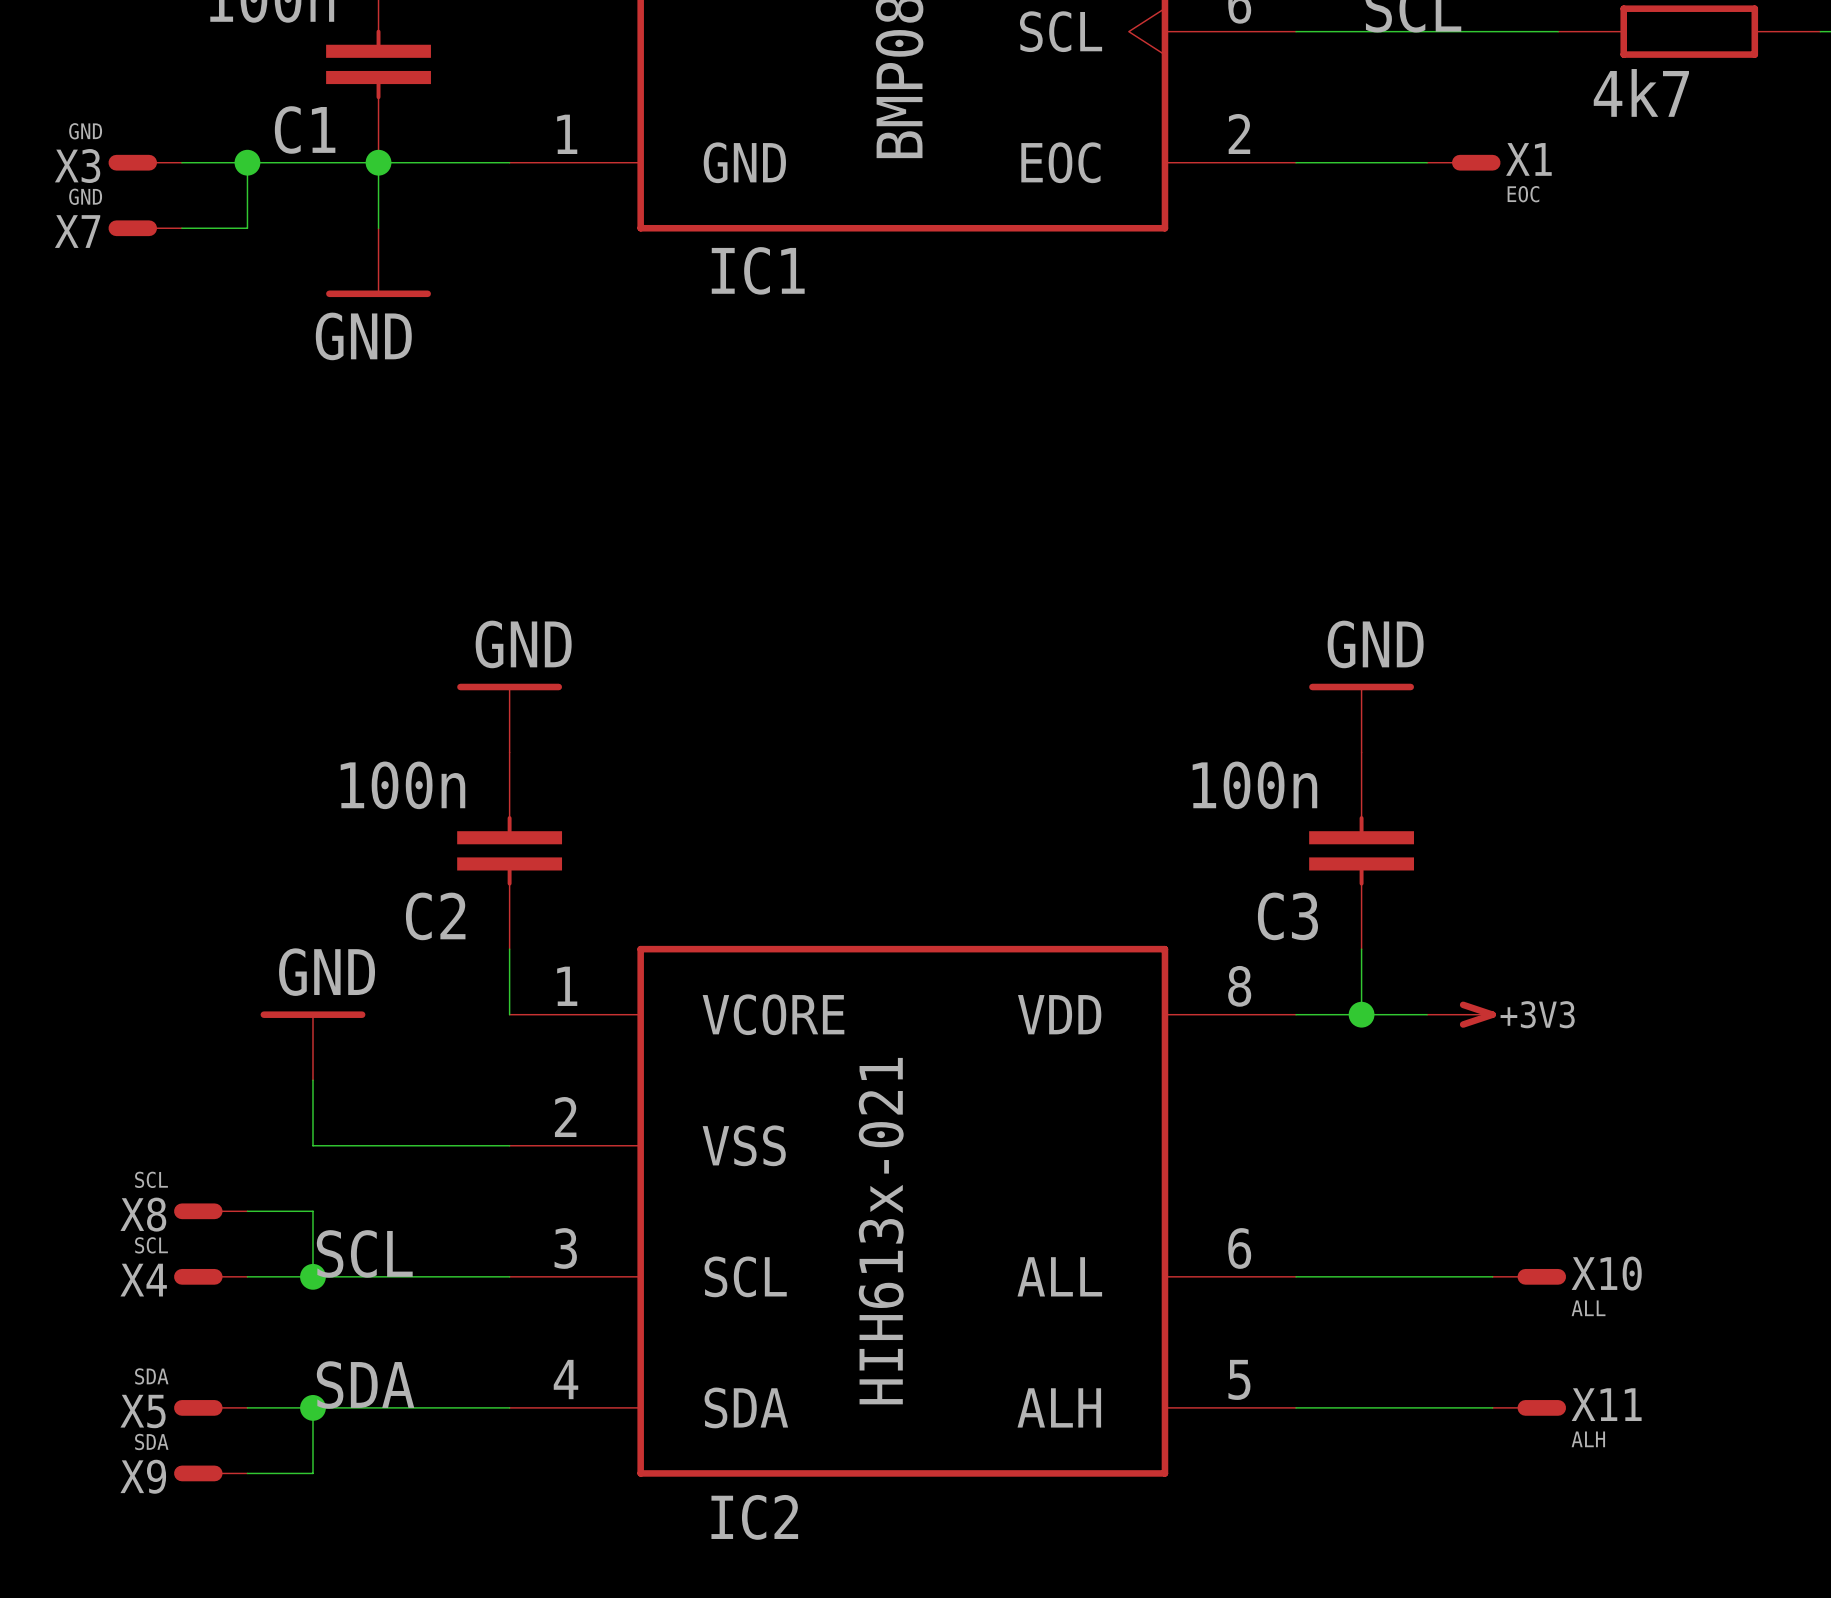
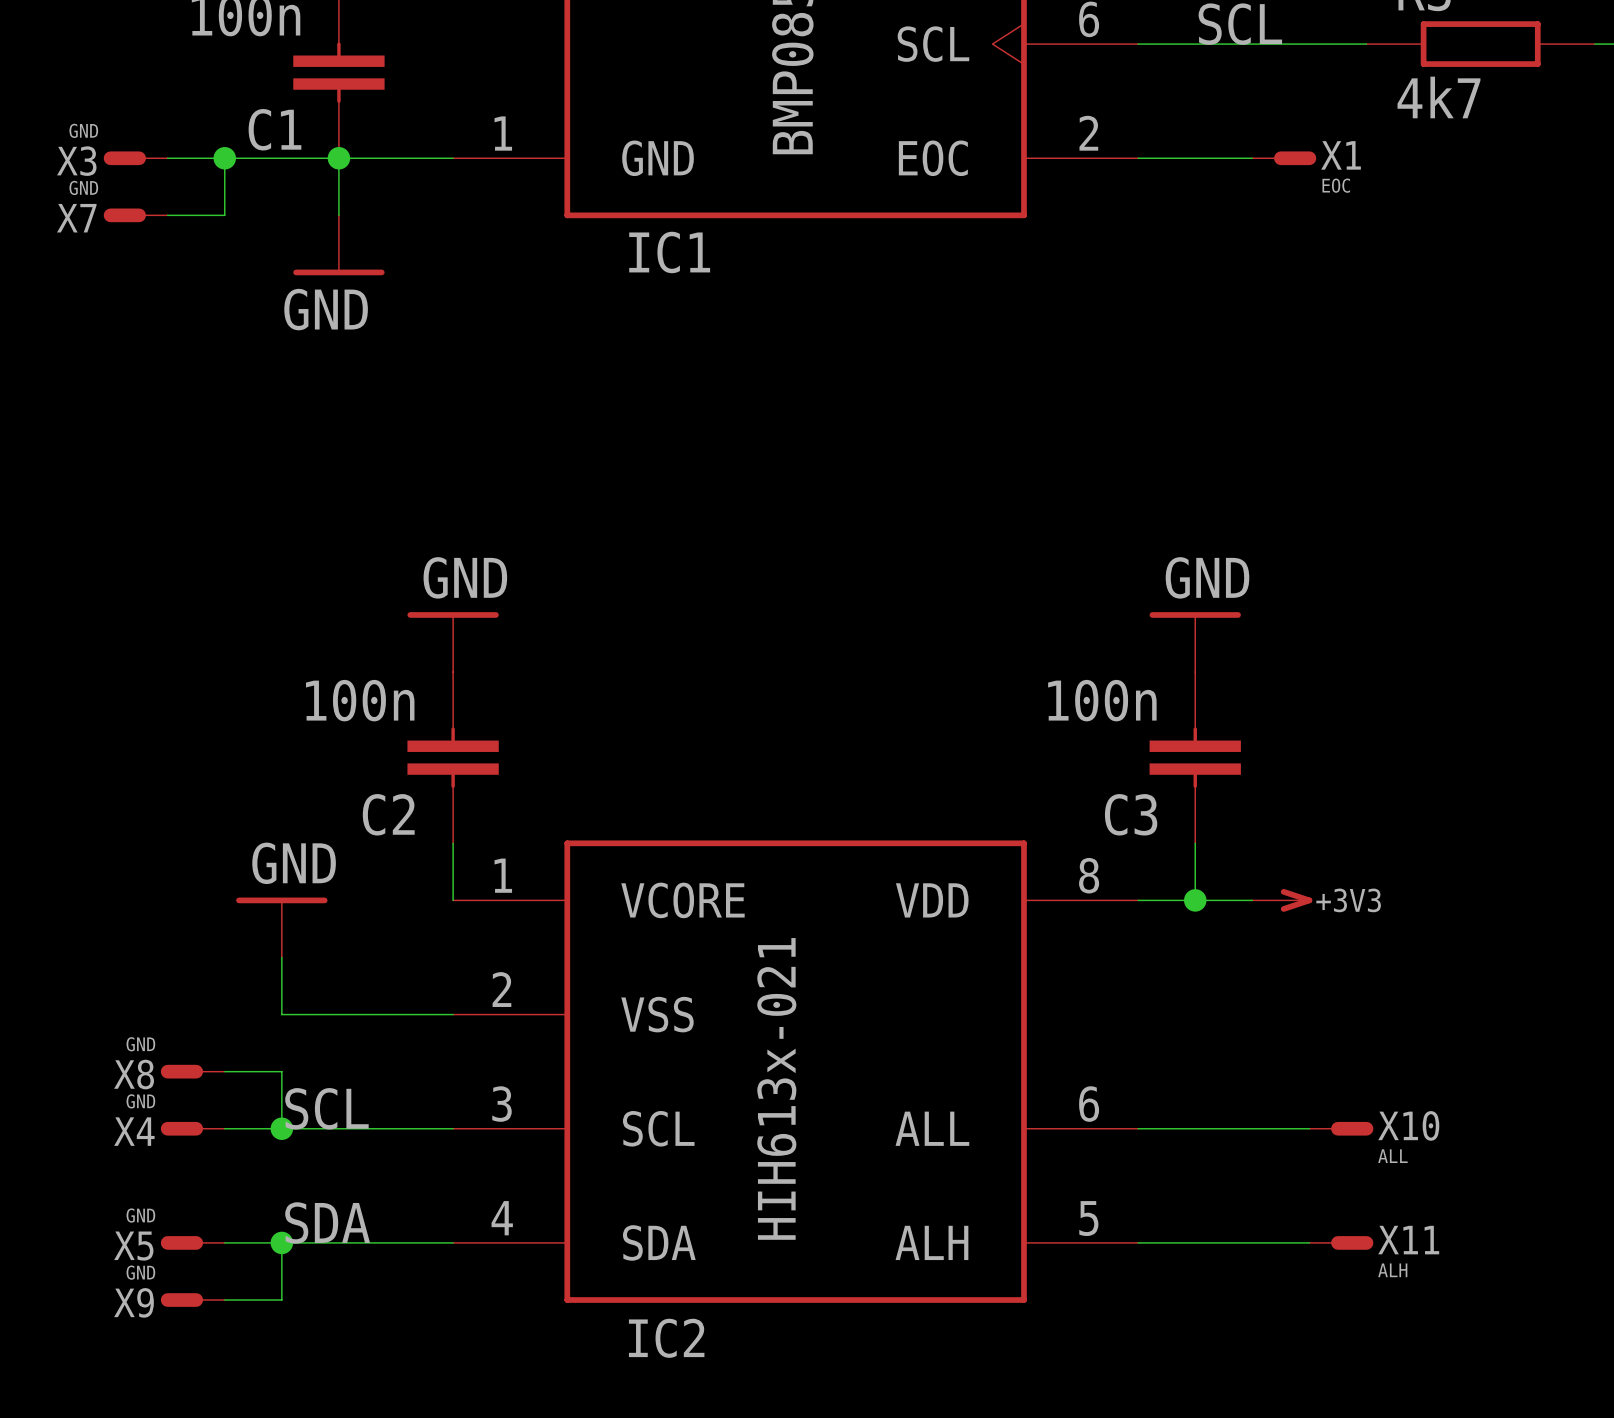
X8 value: SCL (151, 1179) -> GND (140, 1044)
X4 value: SCL (151, 1245) -> GND (140, 1101)
X5 value: SDA (151, 1376) -> GND (140, 1215)
X9 value: SDA (151, 1441) -> GND (140, 1272)

